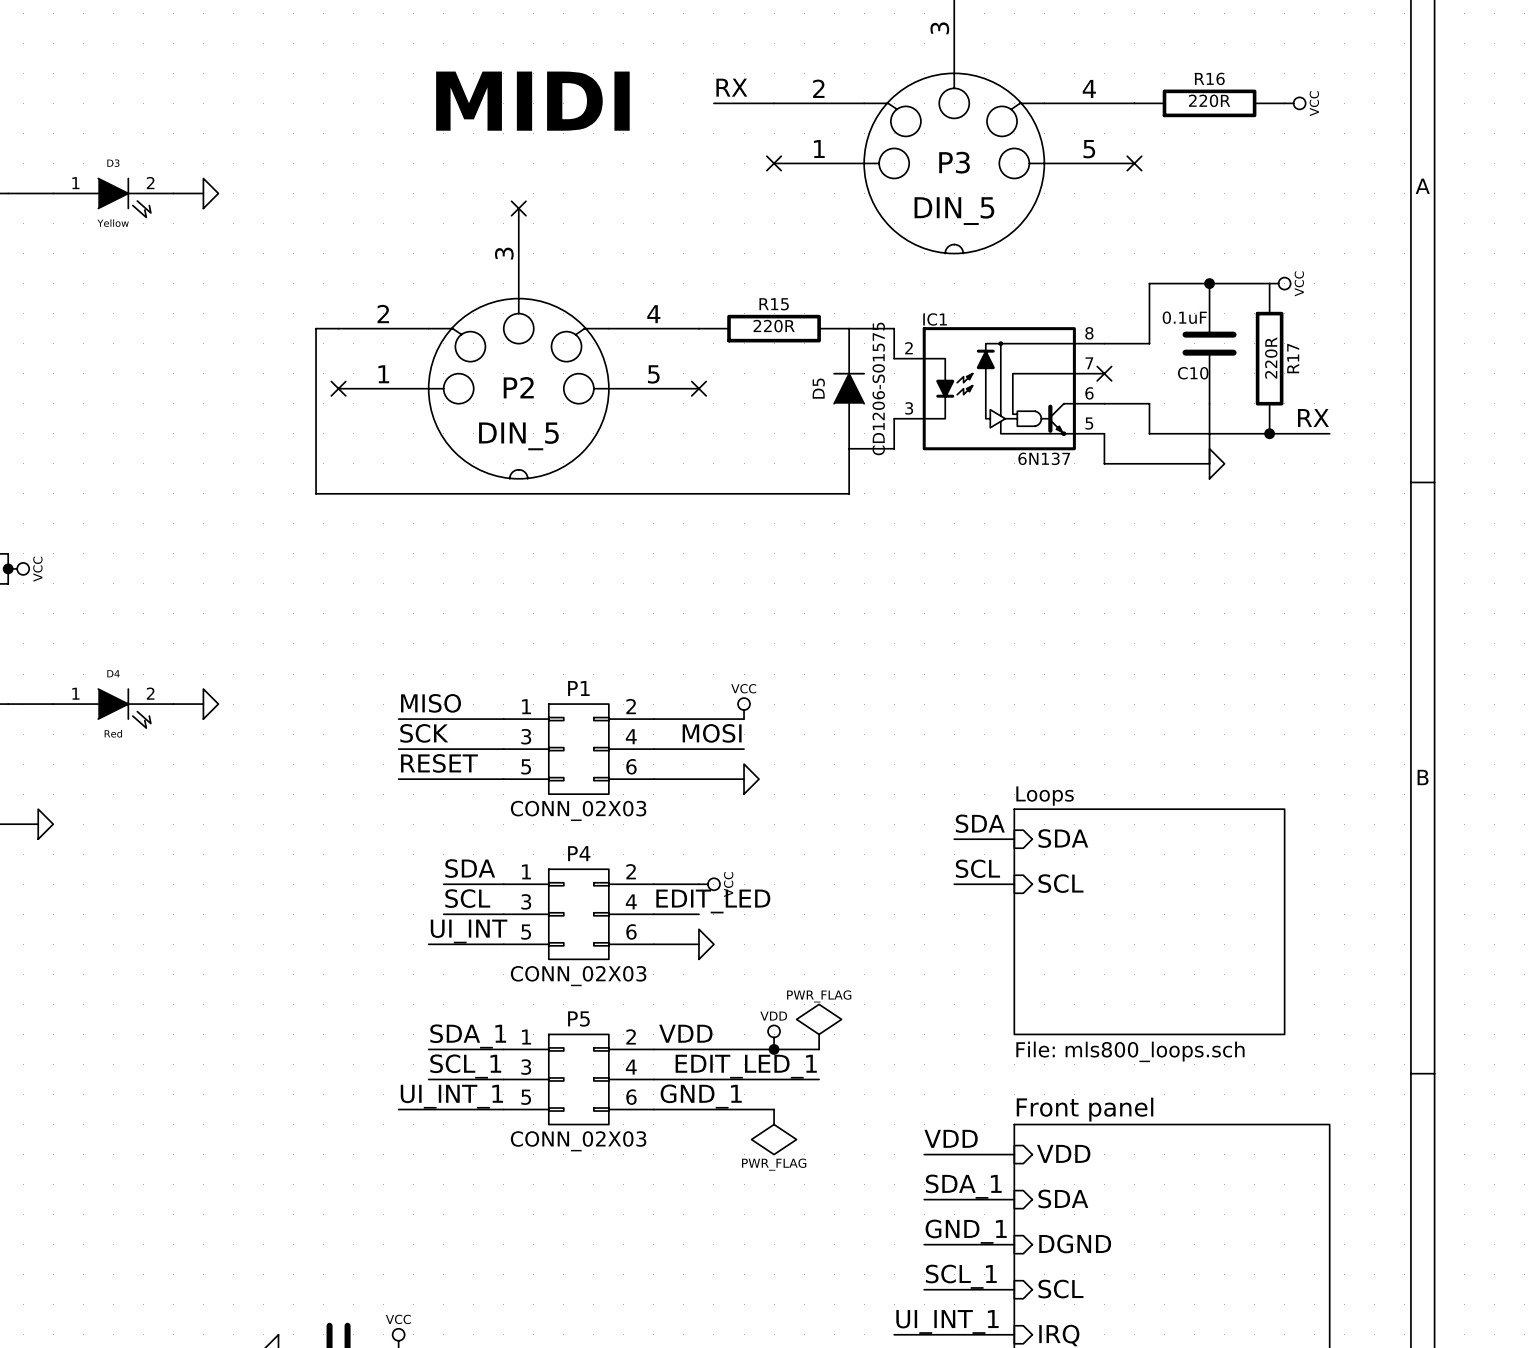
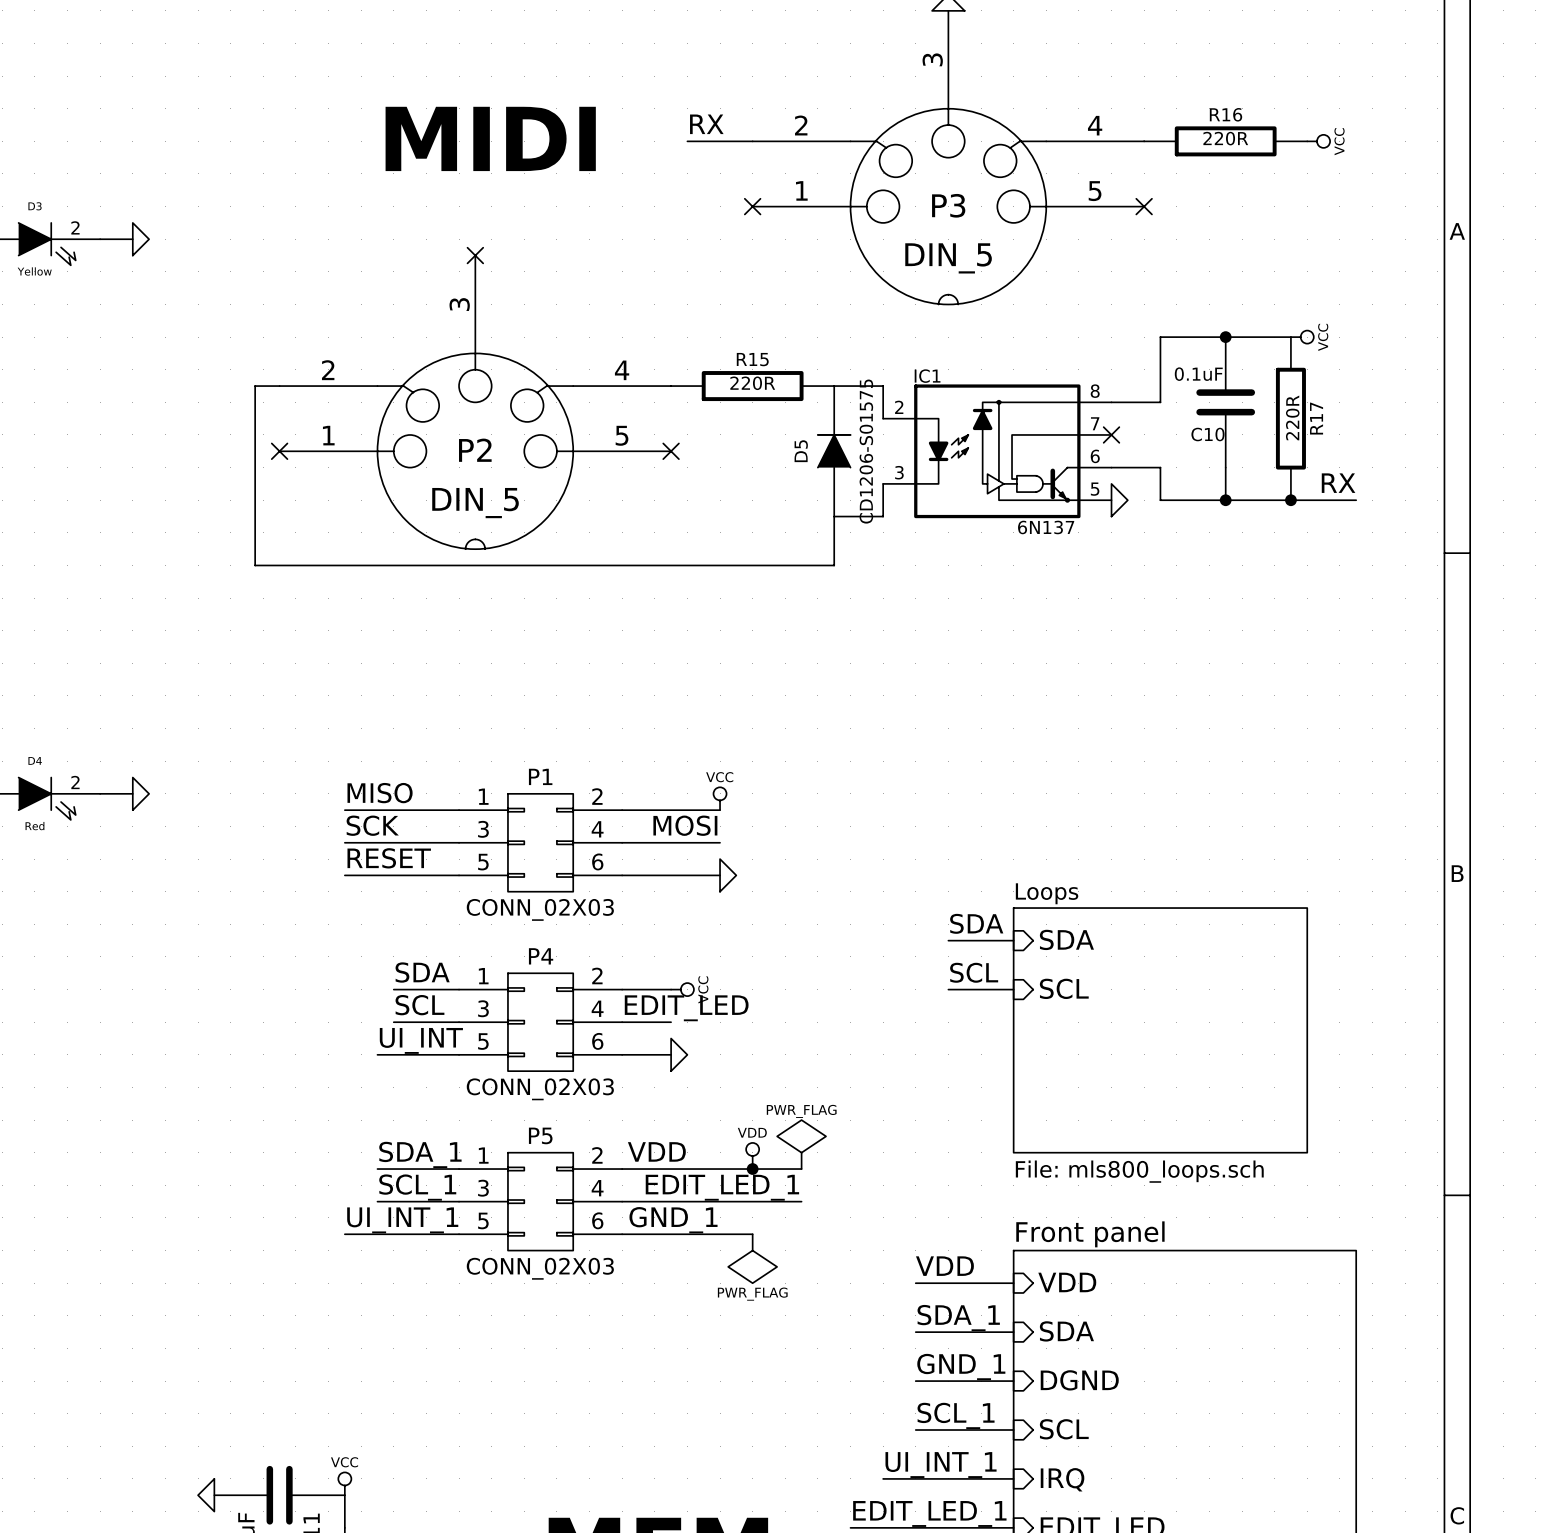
wire: (1104, 433) (1104, 463) (1209, 463) (1209, 433) -> none
junction: none -> (1225, 500)
power symbol position: (1217, 463) -> (1119, 500)

